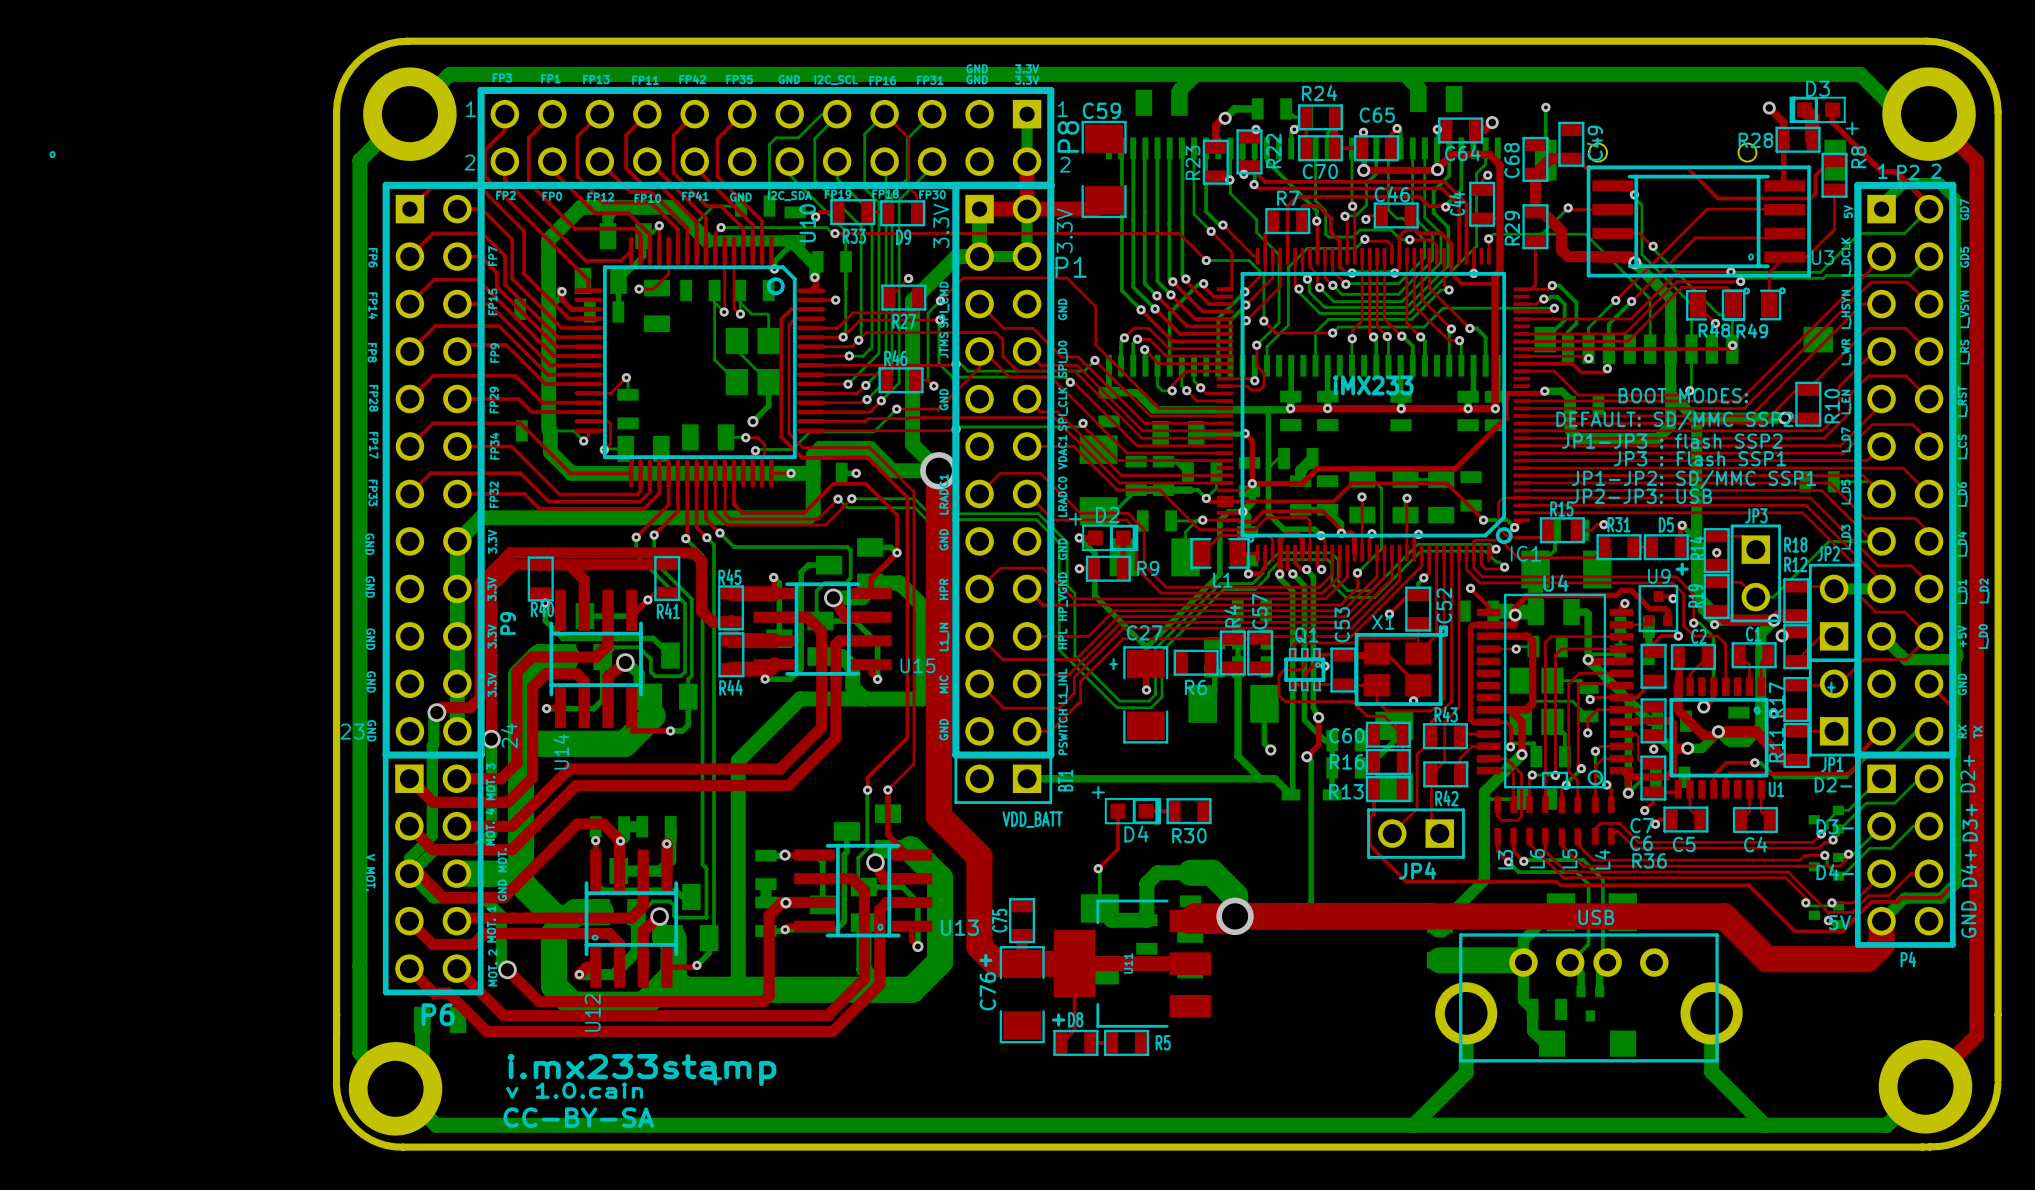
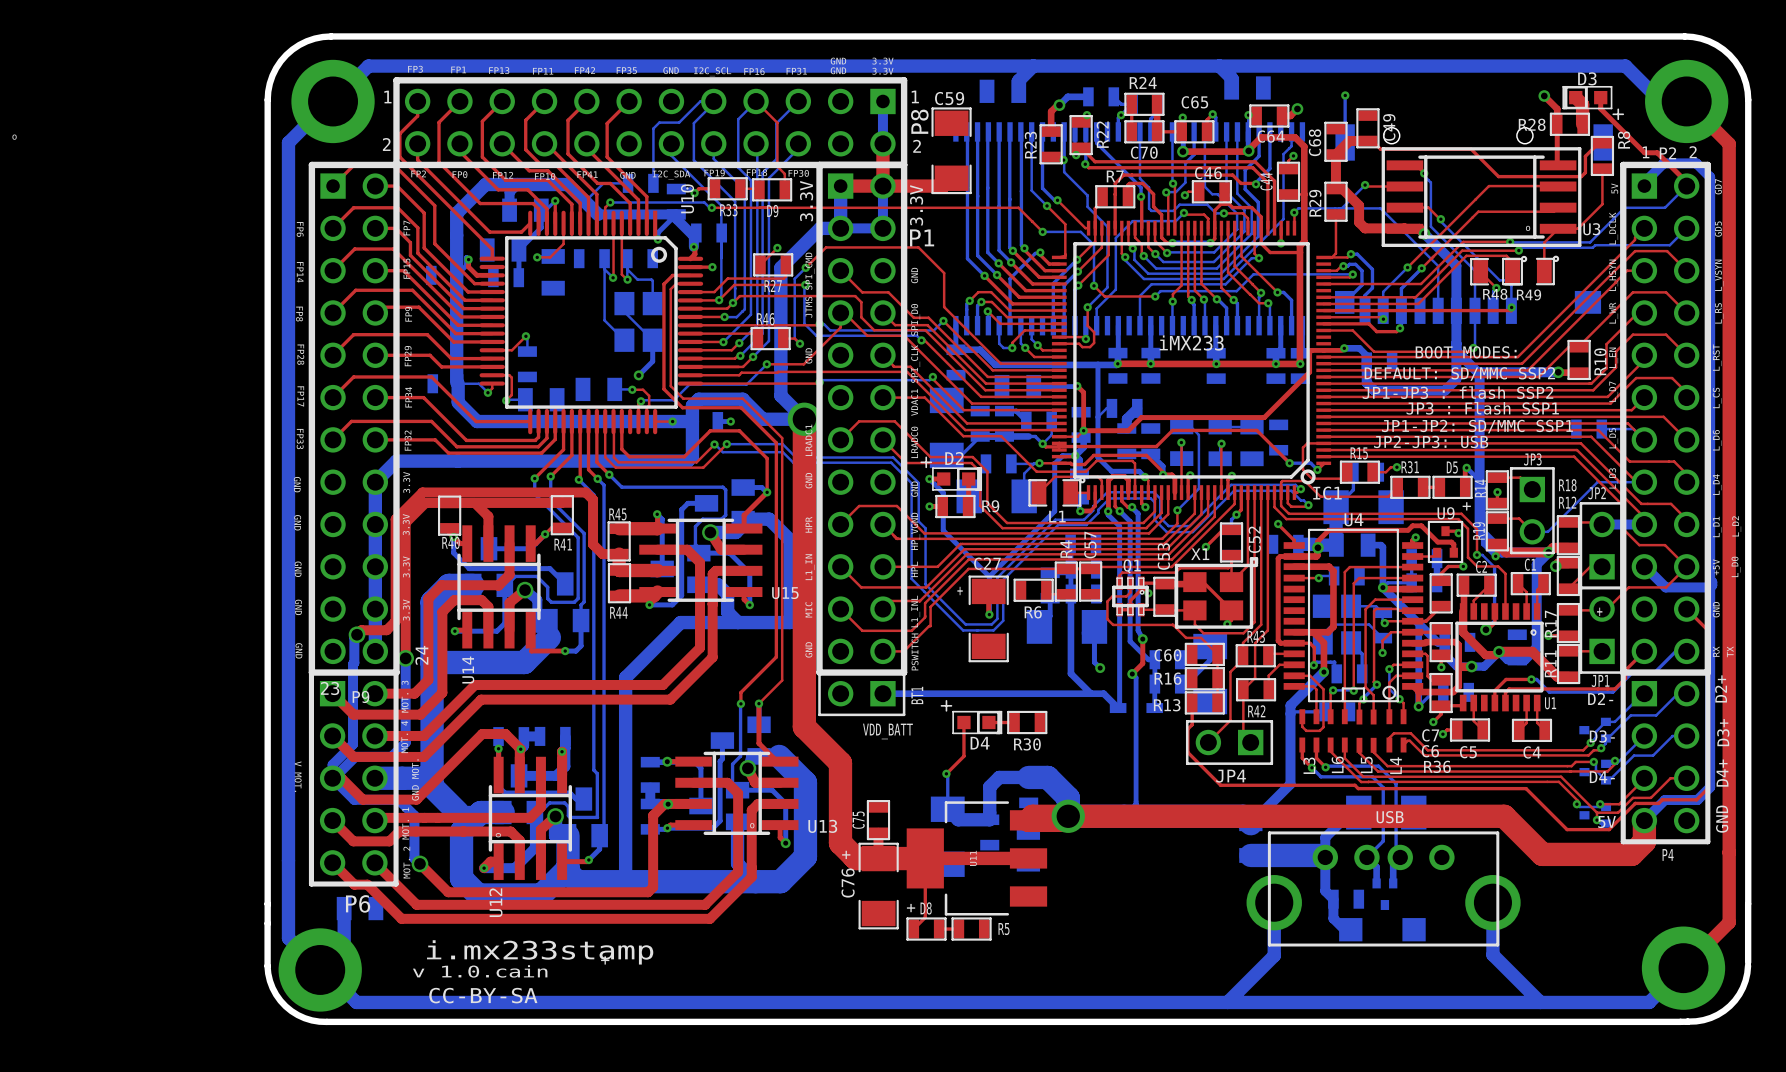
P9 name rotation: 0° (508, 623) -> 90° clockwise (360, 696)
P9 name position: P9 (508, 623) -> P9 (360, 696)
text position: 23 (352, 731) -> 23 (330, 688)

